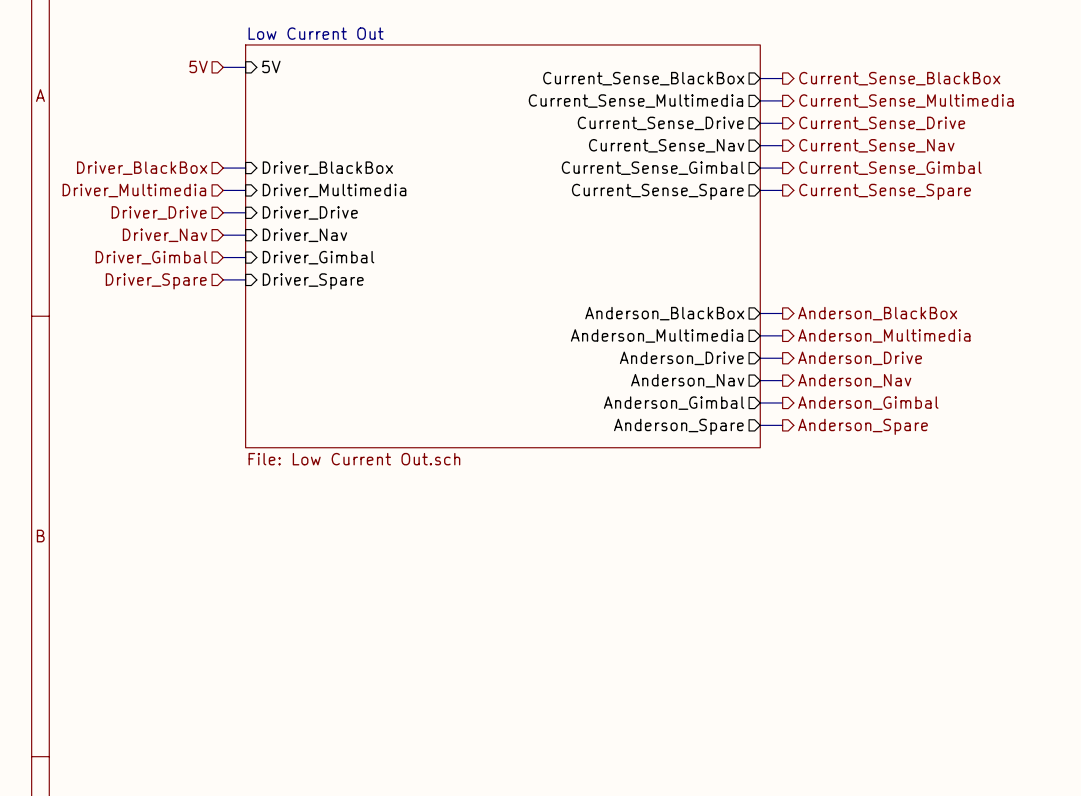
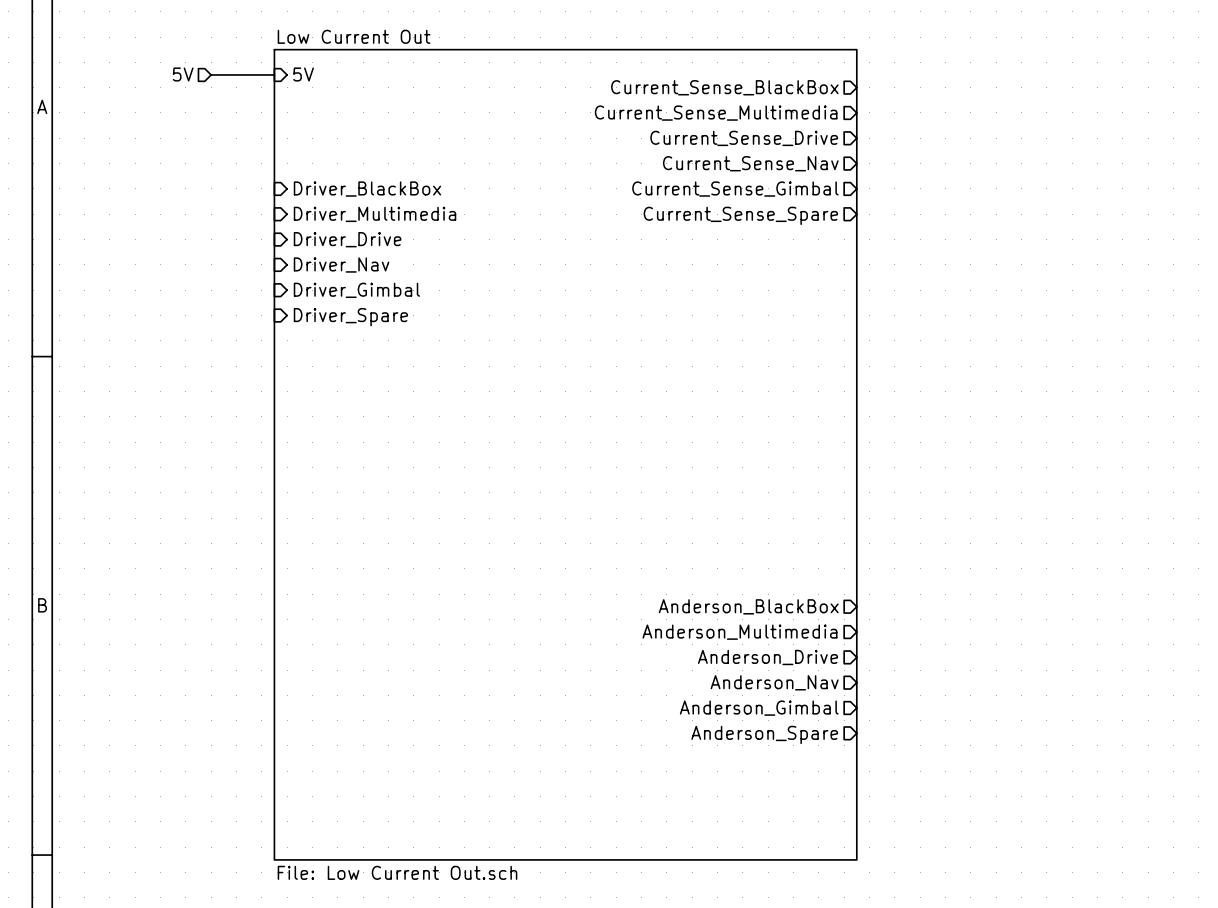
hierarchical label position: 5V (198, 66) -> 5V (183, 74)
wire: none -> (211, 74) (249, 74)
wire: (760, 78) (782, 78) -> none
hierarchical label: Current_Sense_BlackBox (899, 78) -> none
wire: (760, 100) (782, 100) -> none
hierarchical label: Current_Sense_Multimedia (906, 101) -> none
wire: (760, 123) (782, 123) -> none
hierarchical label: Current_Sense_Drive (882, 123) -> none
wire: (760, 145) (782, 145) -> none
hierarchical label: Current_Sense_Nav (876, 145) -> none
hierarchical label: Driver_BlackBox (142, 168) -> none
wire: (223, 168) (245, 168) -> none
wire: (760, 168) (782, 168) -> none
hierarchical label: Current_Sense_Gimbal (890, 168) -> none
hierarchical label: Driver_Multimedia (134, 190) -> none
wire: (223, 190) (245, 190) -> none
wire: (760, 190) (782, 190) -> none
hierarchical label: Current_Sense_Spare (885, 191) -> none
hierarchical label: Driver_Drive (159, 212) -> none
wire: (223, 212) (245, 212) -> none
hierarchical label: Driver_Nav (165, 235) -> none
wire: (223, 235) (245, 235) -> none
sheet Low Current Out: File: Low Current Out.sch (502, 246) -> none
hierarchical label: Driver_Gimbal (151, 257) -> none
wire: (223, 257) (245, 257) -> none
wire: (223, 279) (245, 279) -> none
hierarchical label: Driver_Spare (156, 281) -> none
sheet pin: Anderson_BlackBox (664, 313) -> none
wire: (760, 313) (782, 313) -> none
hierarchical label: Anderson_BlackBox (877, 313) -> none
sheet pin: Anderson_Multimedia (657, 335) -> none
wire: (760, 335) (782, 335) -> none
hierarchical label: Anderson_Multimedia (884, 335) -> none
sheet pin: Anderson_Drive (681, 358) -> none
wire: (760, 358) (782, 358) -> none
hierarchical label: Anderson_Drive (860, 358) -> none
sheet pin: Anderson_Nav (687, 380) -> none
wire: (760, 380) (782, 380) -> none
hierarchical label: Anderson_Nav (854, 380) -> none
sheet Low Current Out: none -> File: Low Current Out.sch (565, 454)
wire: (760, 402) (782, 402) -> none
sheet pin: Anderson_Gimbal (674, 403) -> none
hierarchical label: Anderson_Gimbal (868, 403) -> none
wire: (760, 425) (782, 425) -> none
sheet pin: Anderson_Spare (678, 426) -> none
hierarchical label: Anderson_Spare (863, 426) -> none
sheet pin: none -> Anderson_BlackBox (748, 606)
sheet pin: none -> Anderson_Multimedia (739, 632)
sheet pin: none -> Anderson_Drive (767, 657)
sheet pin: none -> Anderson_Nav (774, 682)
sheet pin: none -> Anderson_Gimbal (759, 708)
sheet pin: none -> Anderson_Spare (764, 734)

